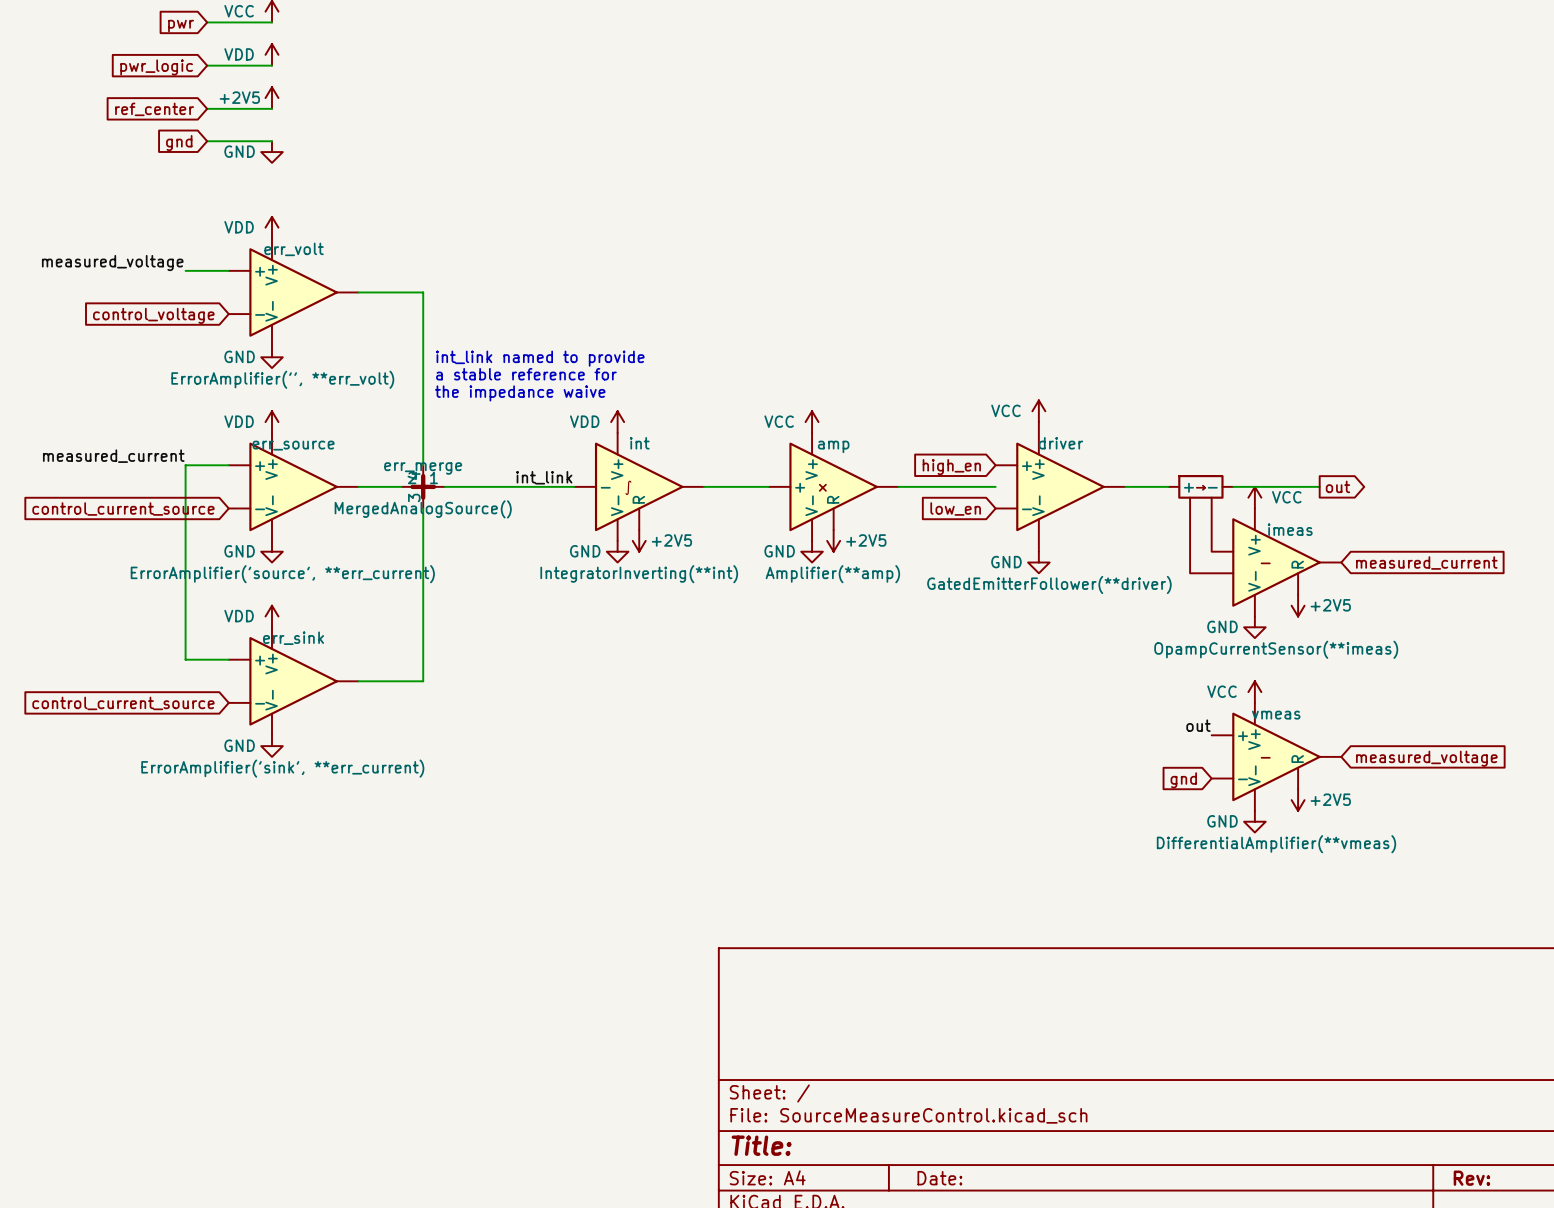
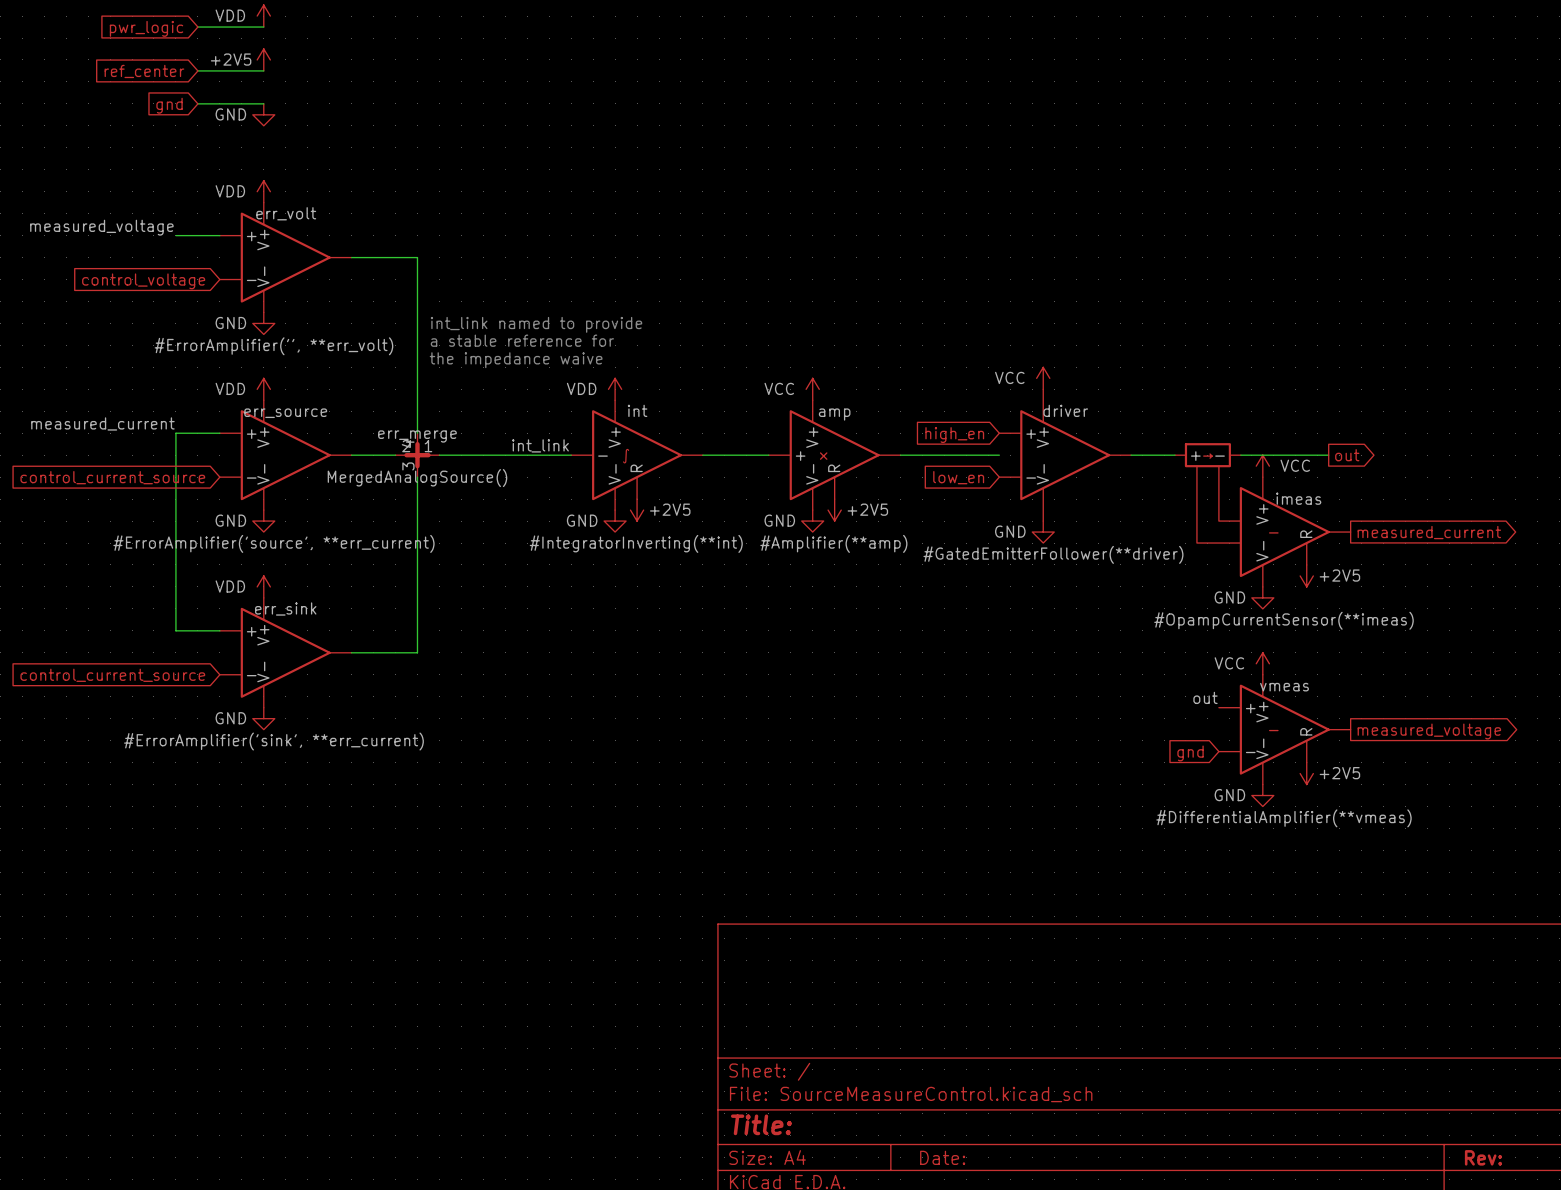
err_volt value: ErrorAmplifier('', **err_volt) (282, 379) -> #ErrorAmplifier('', **err_volt) (273, 346)
global label shape: input (1426, 563) -> output (1429, 532)
err_source value: ErrorAmplifier('source', **err_current) (282, 574) -> #ErrorAmplifier('source', **err_current) (273, 543)
int value: IntegratorInverting(**int) (639, 574) -> #IntegratorInverting(**int) (636, 543)
amp value: Amplifier(**amp) (832, 574) -> #Amplifier(**amp) (833, 543)
driver value: GatedEmitterFollower(**driver) (1049, 584) -> #GatedEmitterFollower(**driver) (1053, 554)
imeas value: OpampCurrentSensor(**imeas) (1276, 649) -> #OpampCurrentSensor(**imeas) (1283, 620)
global label shape: input (1426, 758) -> output (1429, 731)
err_sink value: ErrorAmplifier('sink', **err_current) (282, 768) -> #ErrorAmplifier('sink', **err_current) (273, 741)
vmeas value: DifferentialAmplifier(**vmeas) (1276, 844) -> #DifferentialAmplifier(**vmeas) (1283, 818)

